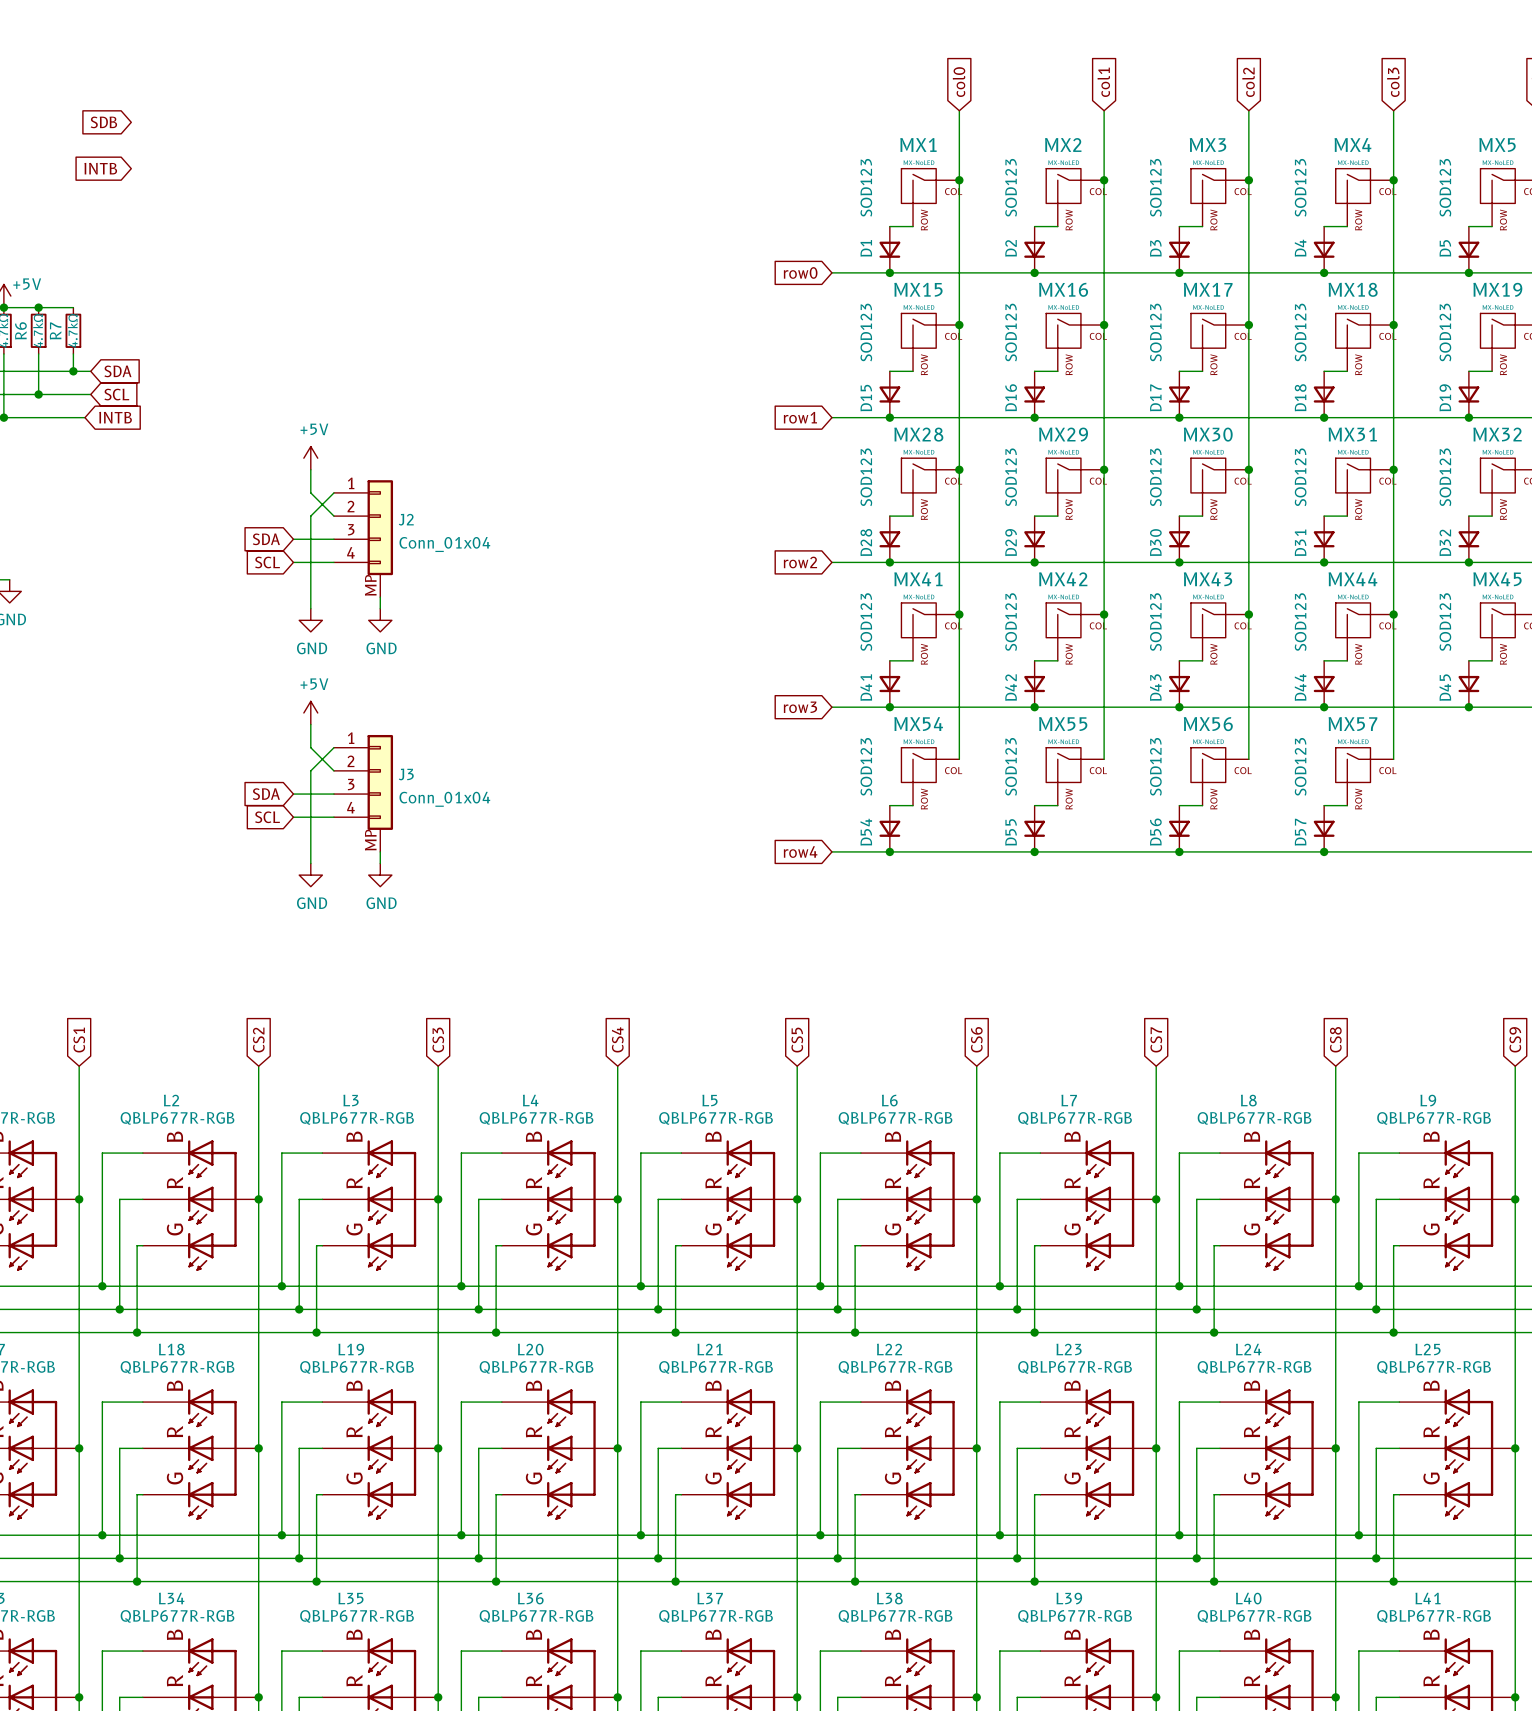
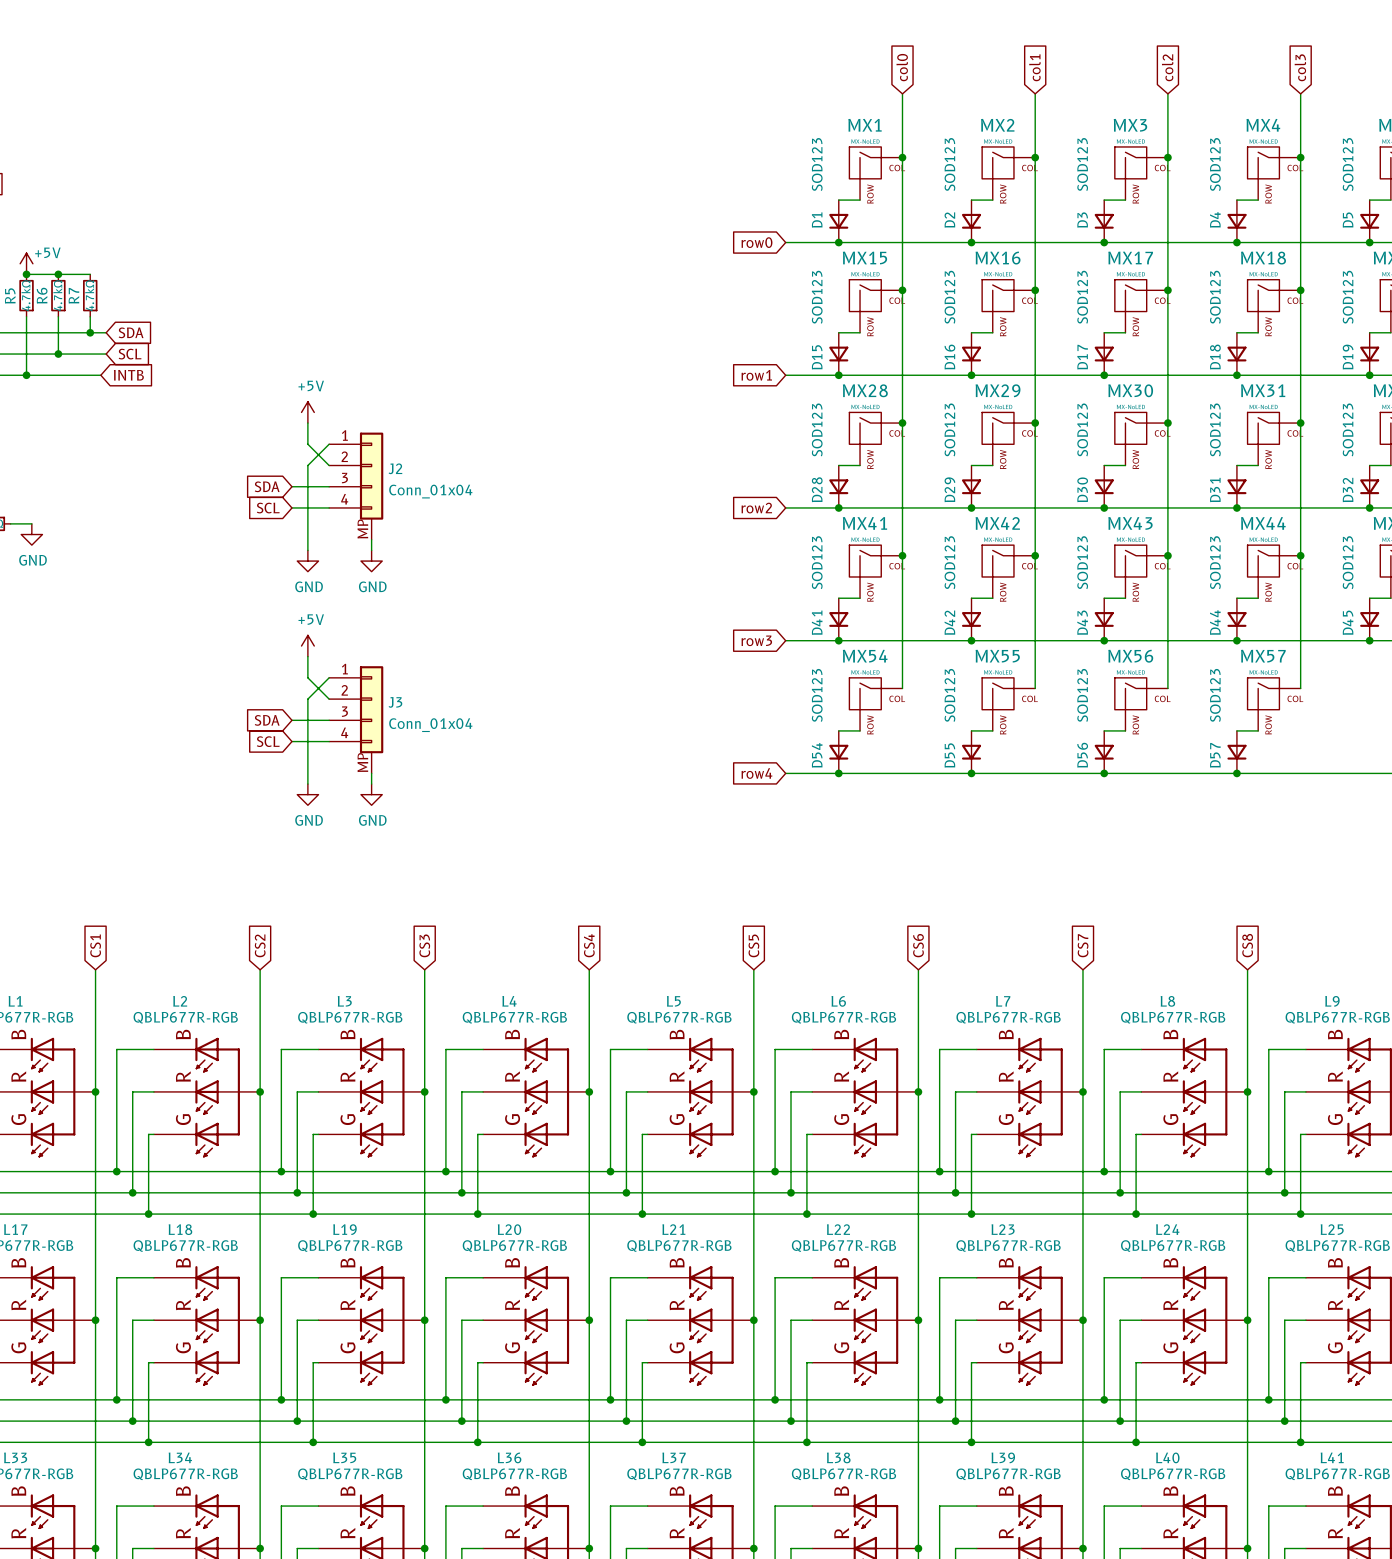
global label: SDB (103, 122) -> none
global label: INTB (100, 168) -> none

